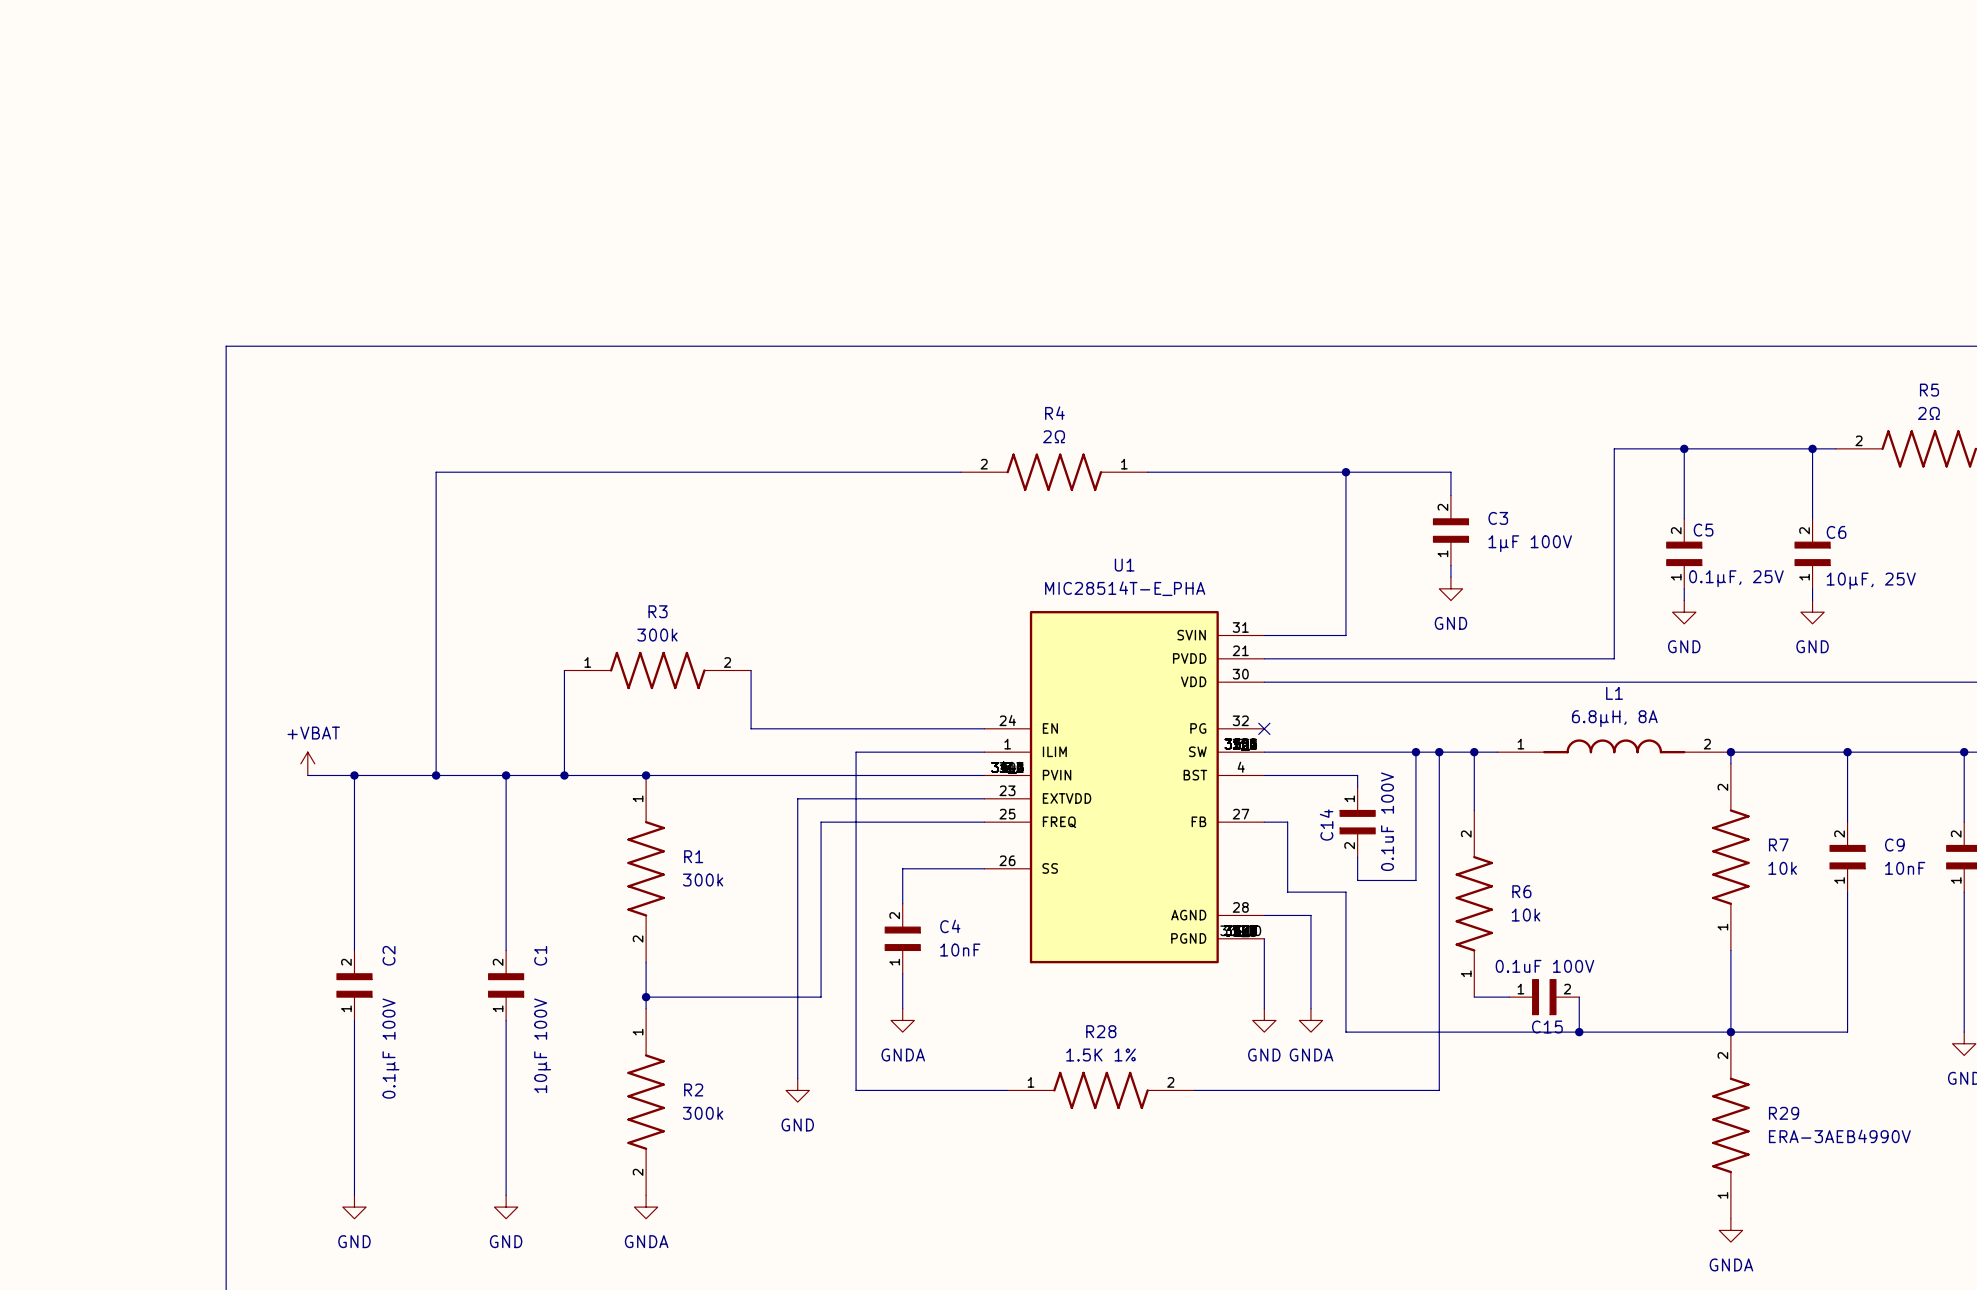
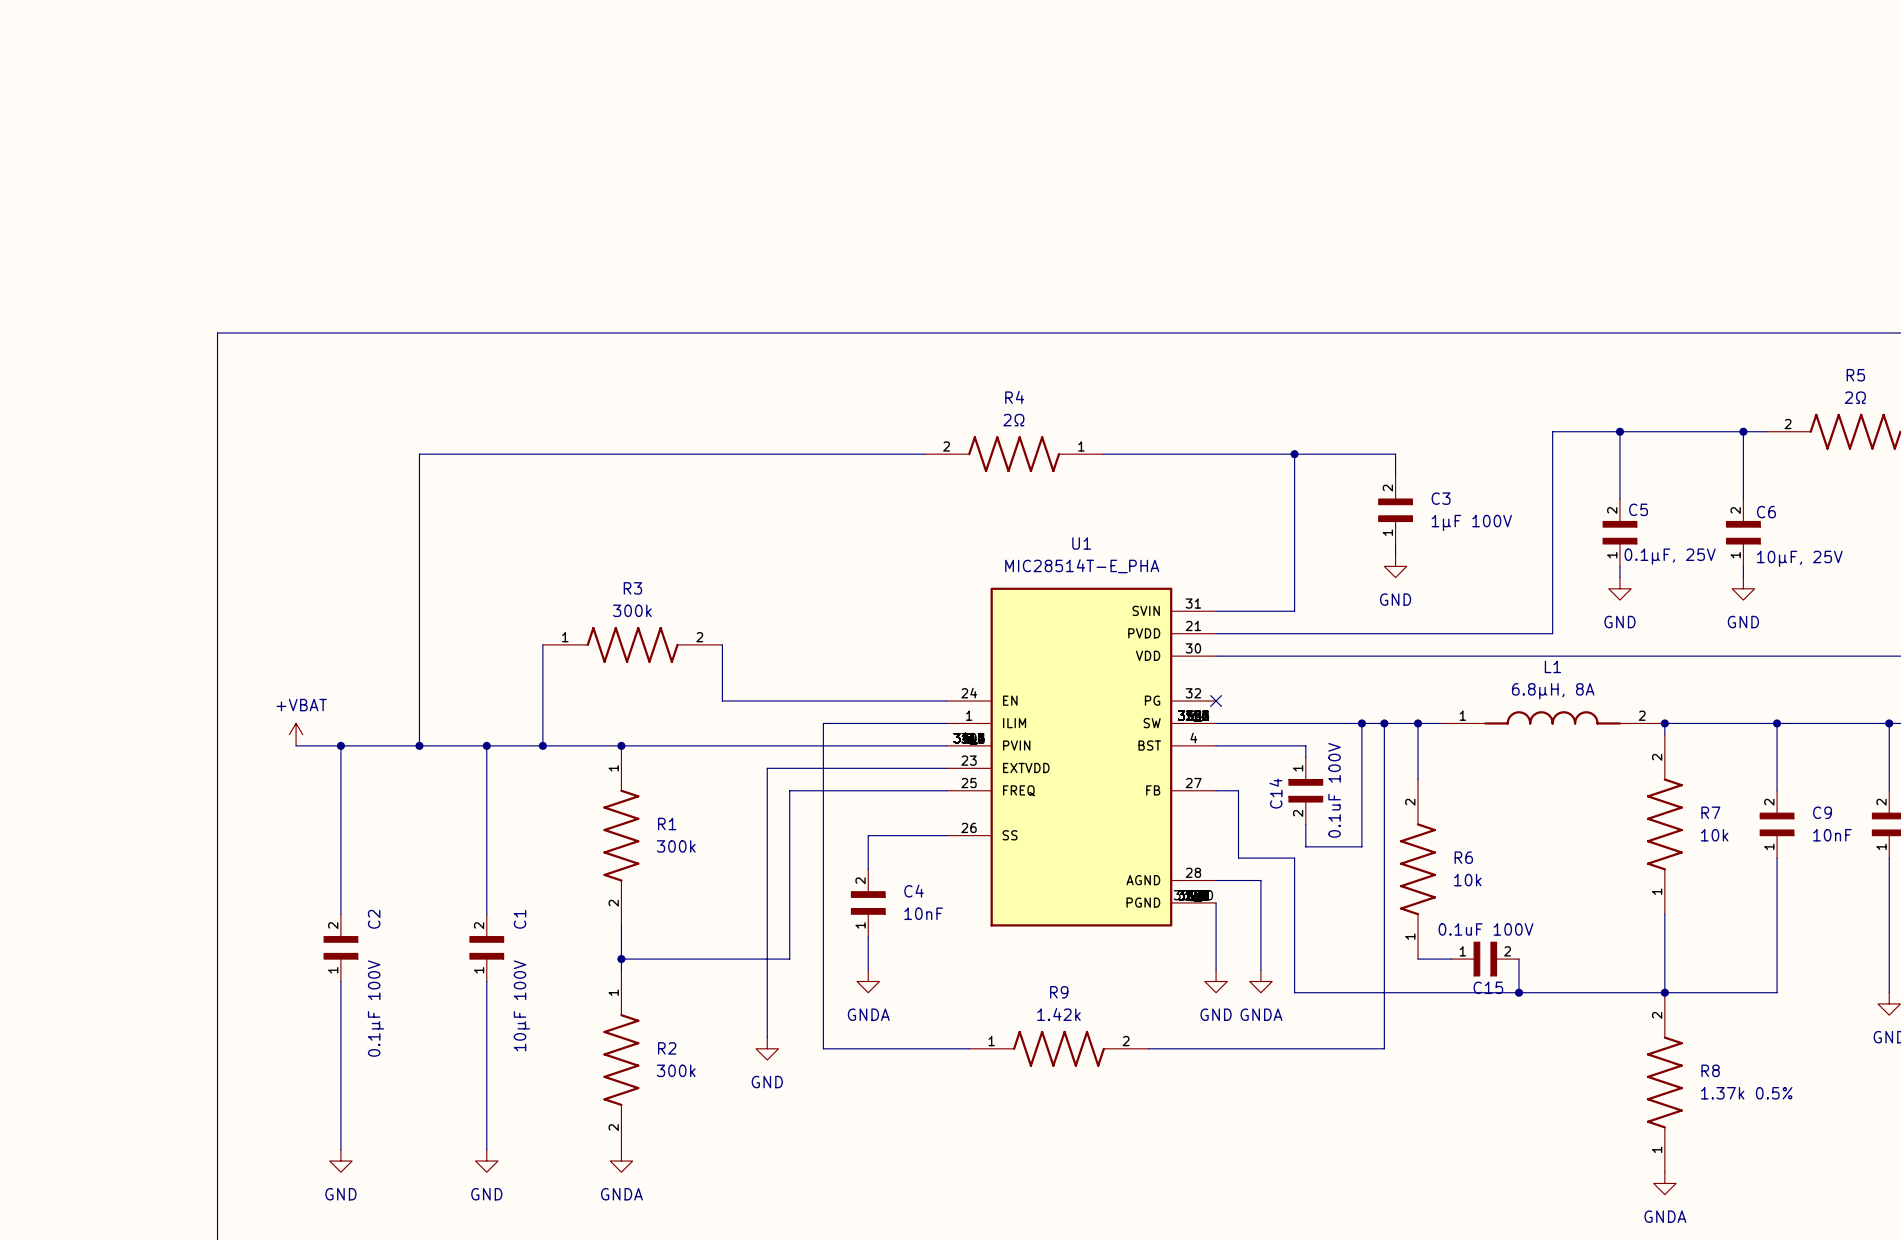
R28 name: R28 (1101, 1031) -> R9 (1059, 992)
R28 value: 1.5K 1% (1101, 1055) -> 1.42k (1058, 1014)
R29 name: R29 (1784, 1113) -> R8 (1710, 1070)
R29 value: ERA-3AEB4990V (1839, 1136) -> 1.37k 0.5% (1746, 1093)

